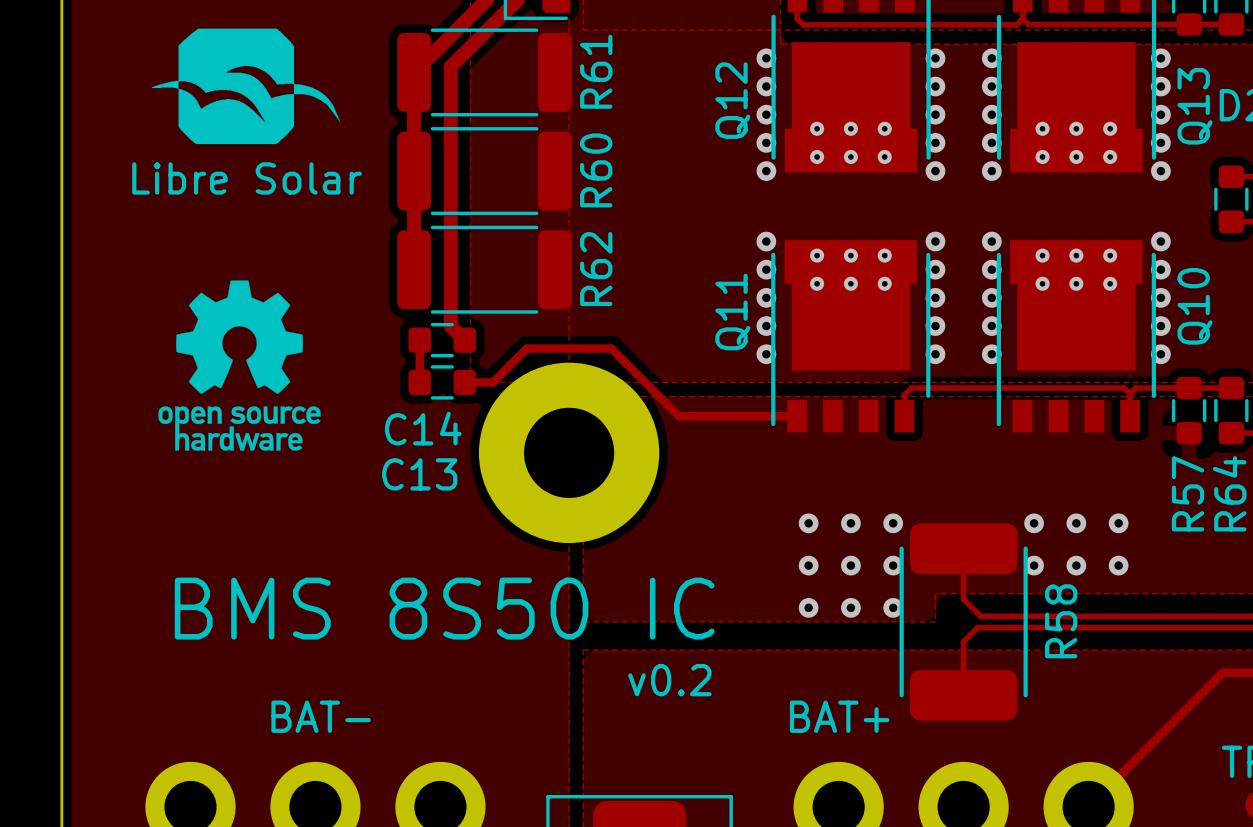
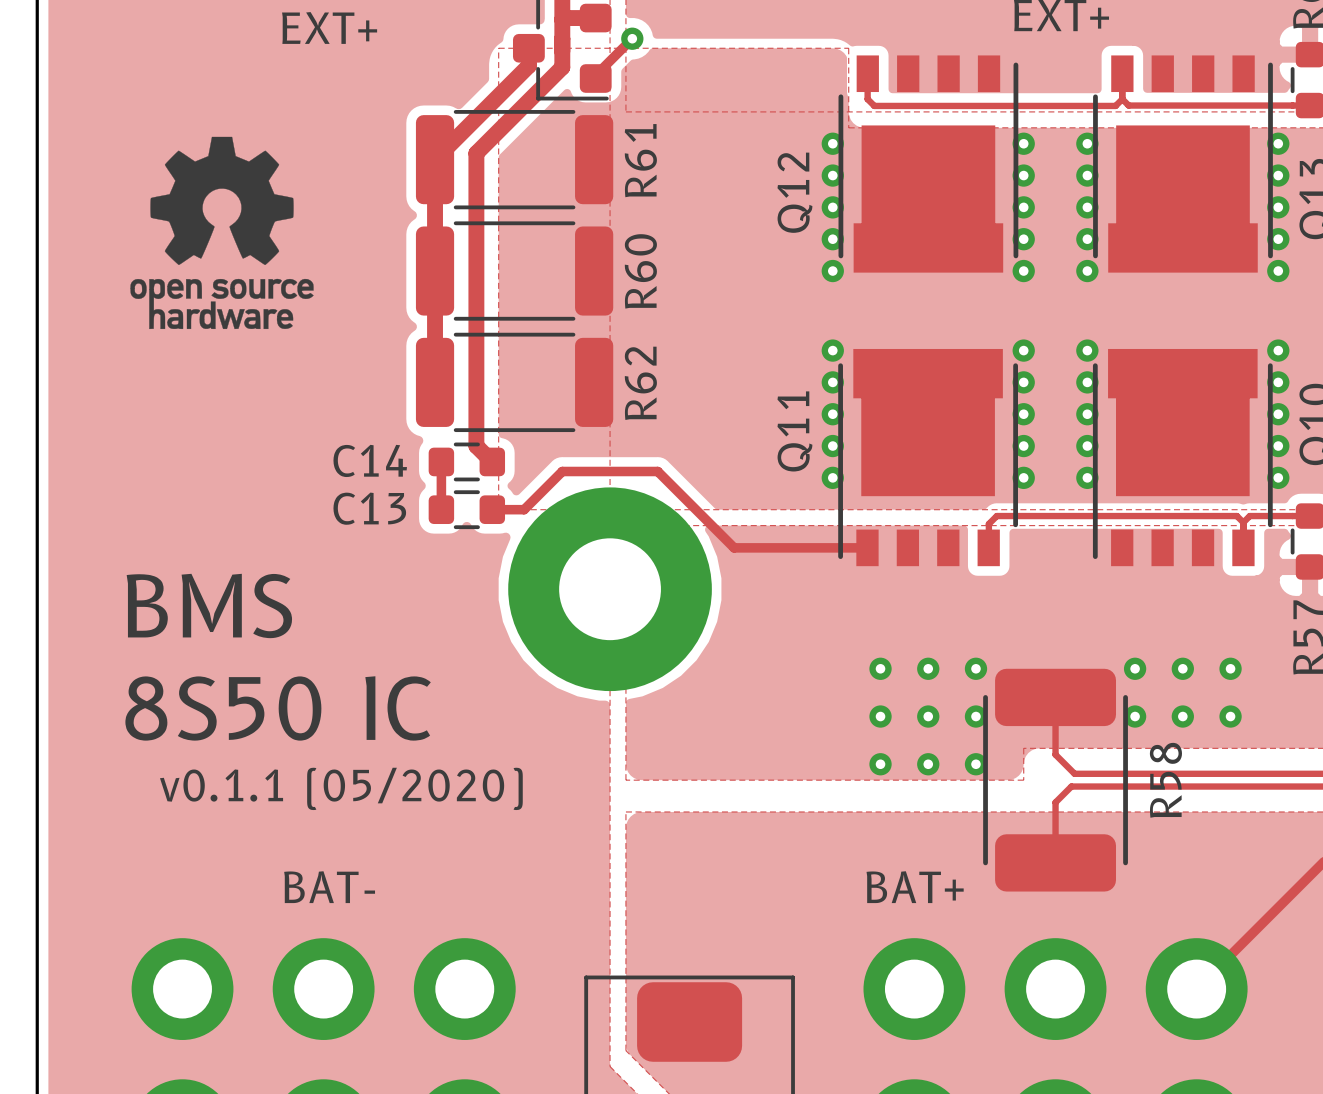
drawing: [151, 28, 341, 145] -> none
via: (817, 128) -> none
via: (850, 128) -> none
via: (884, 128) -> none
via: (1042, 128) -> none
via: (1076, 128) -> none
via: (1110, 128) -> none
via: (817, 156) -> none
via: (850, 156) -> none
via: (884, 156) -> none
via: (1042, 156) -> none
via: (1076, 156) -> none
via: (1110, 156) -> none
via: (817, 255) -> none
via: (850, 255) -> none
via: (884, 255) -> none
via: (1042, 255) -> none
via: (1076, 255) -> none
via: (1110, 255) -> none
via: (817, 283) -> none
via: (850, 283) -> none
via: (884, 283) -> none
via: (1042, 283) -> none
via: (1076, 283) -> none
via: (1110, 283) -> none
drawing position: (239, 365) -> (222, 232)
C14 name position: C14 (423, 428) -> C14 (370, 460)
text: none -> BMS (209, 605)
C13 name position: C13 (419, 474) -> C13 (369, 508)
text: BMS 8S50 IC (444, 608) -> 8S50 IC (278, 708)
text: none -> v0.1.1 (05/2020) (341, 788)
text: v0.2 (669, 680) -> none

